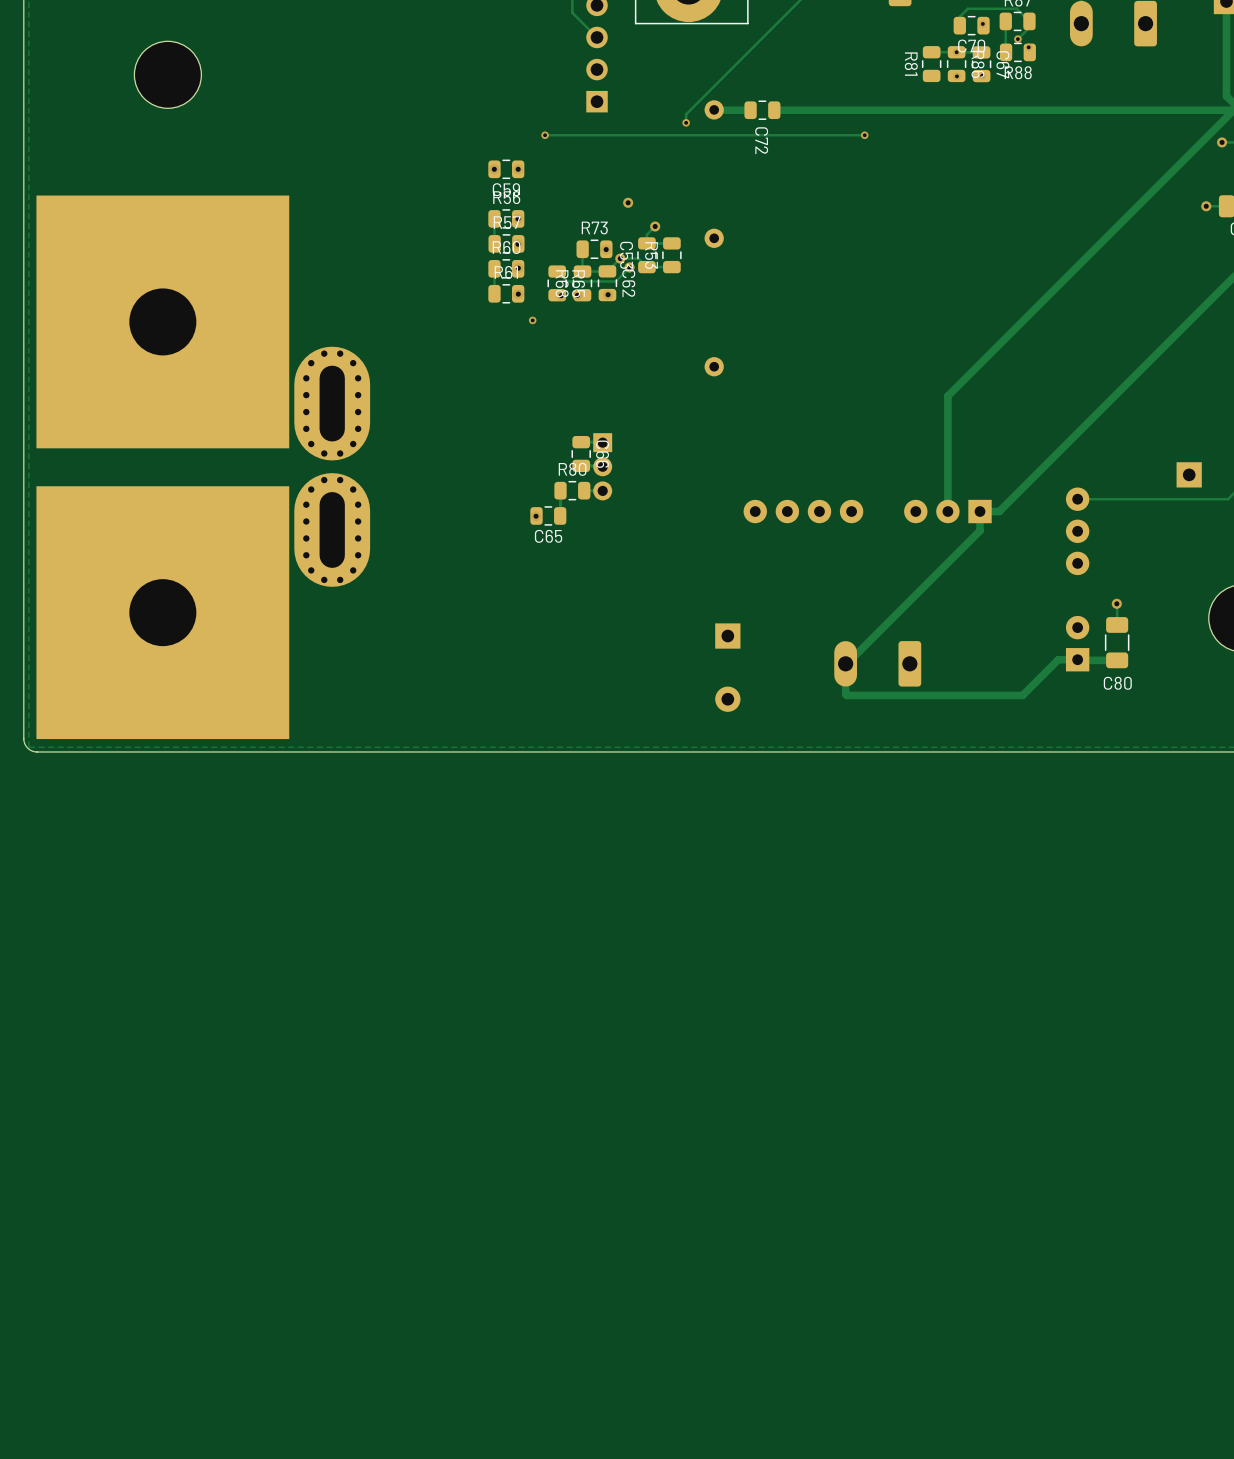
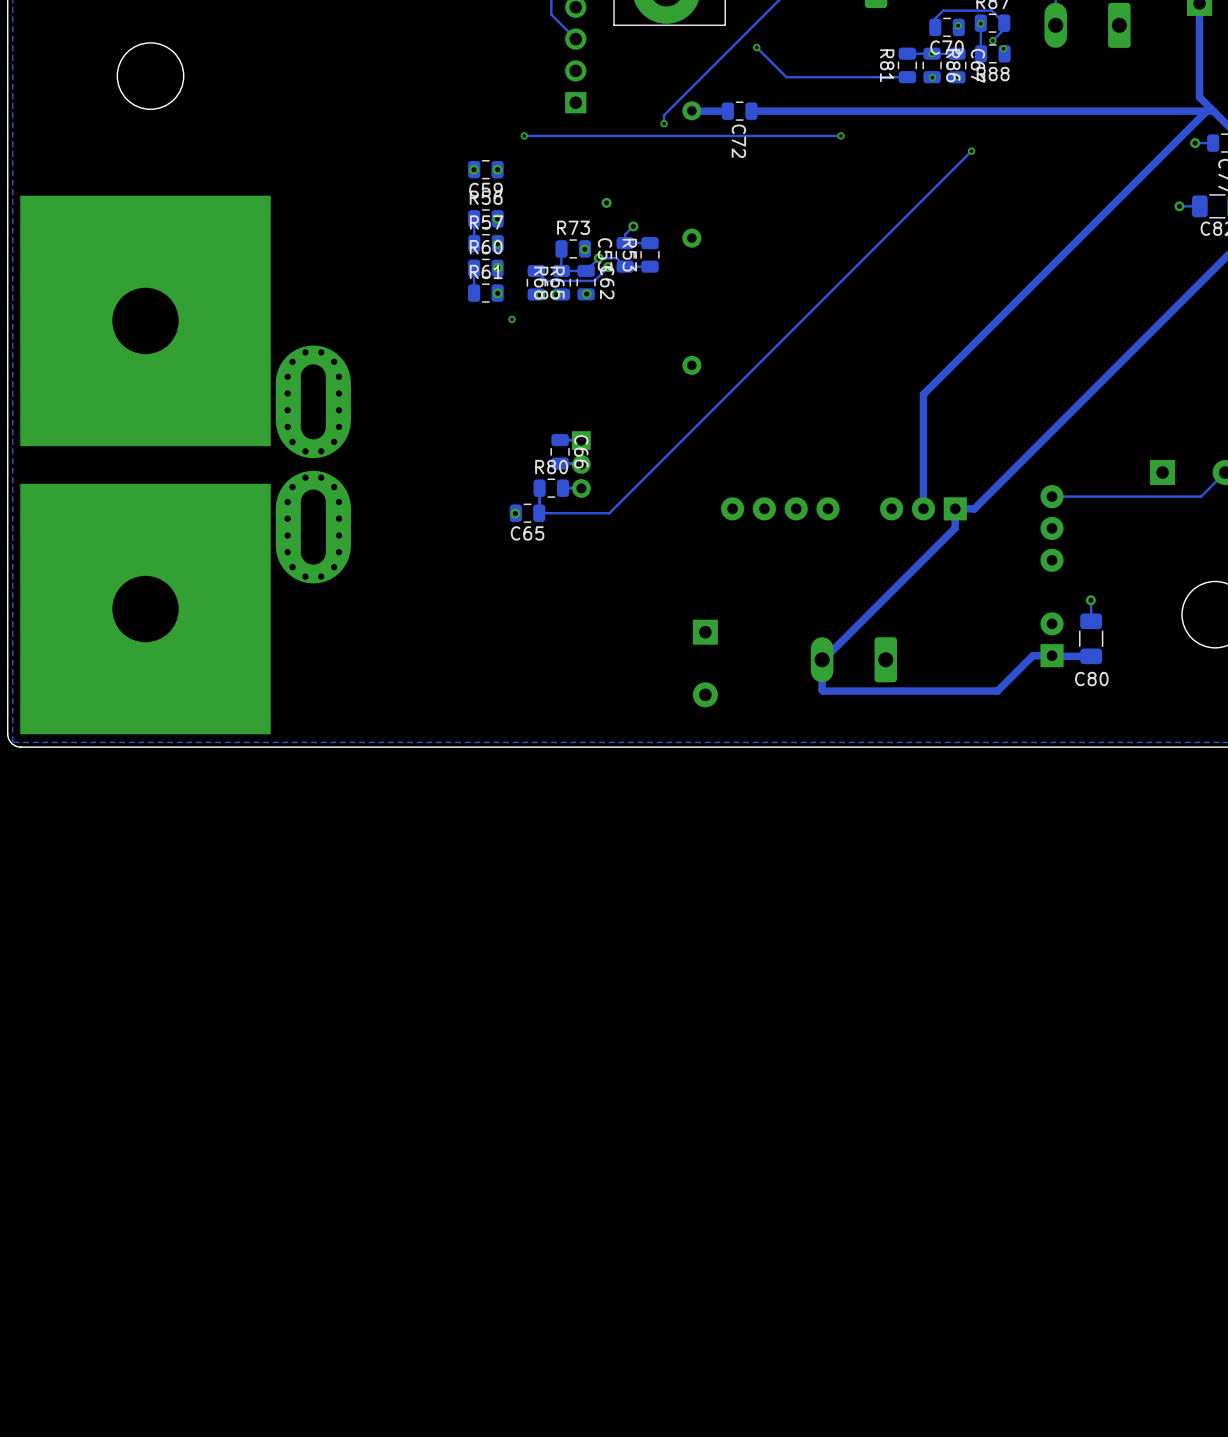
via: none -> (980, 23)
track: none -> (756, 47) (786, 77) (907, 77)
via: none -> (756, 47)
track: none -> (971, 151) (609, 513) (539, 513)
via: none -> (971, 151)

